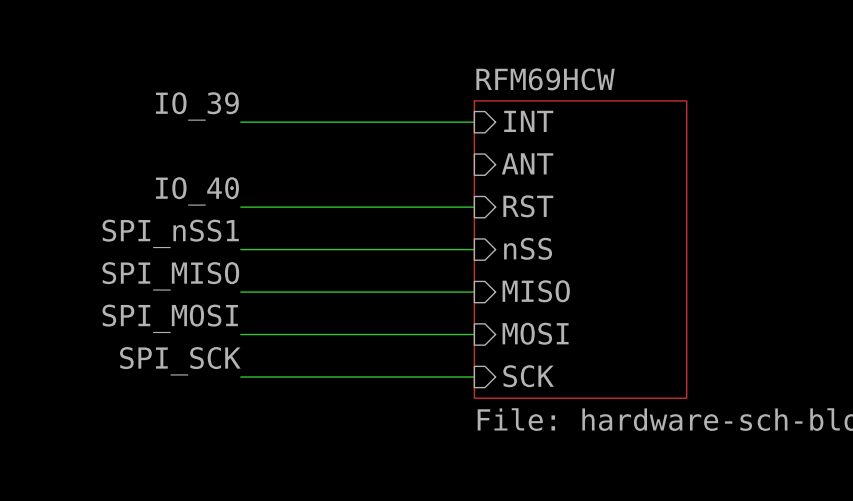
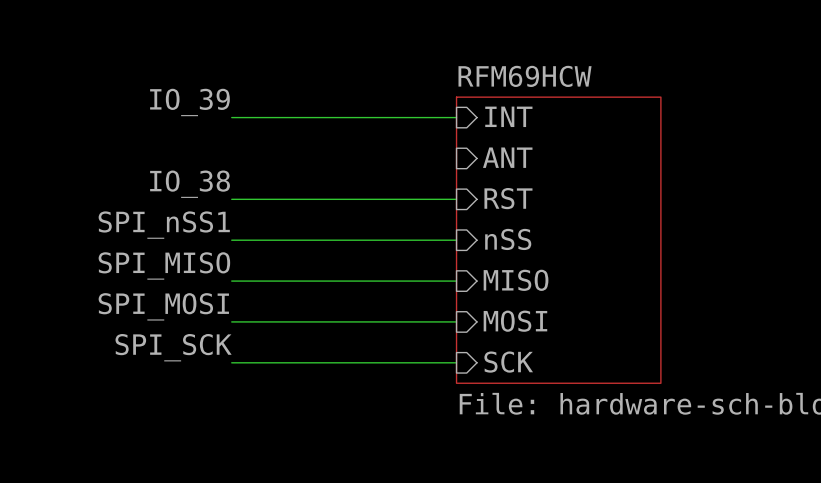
label: IO_40 (197, 191) -> IO_38 (190, 184)

